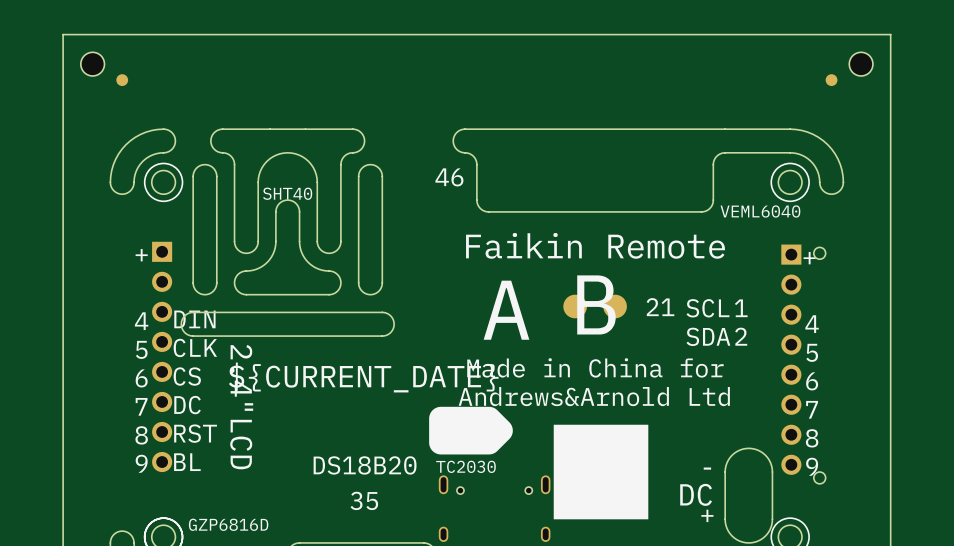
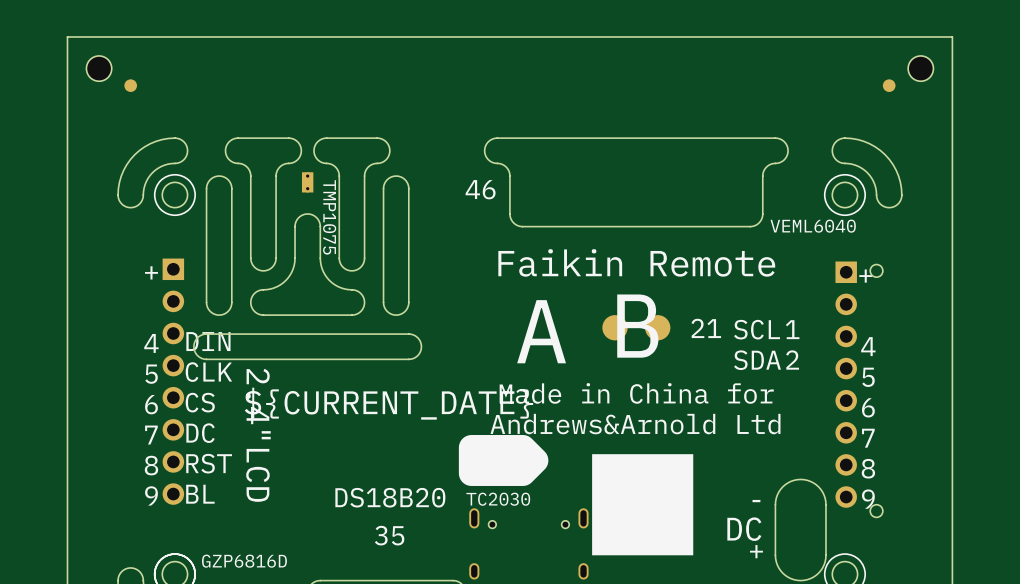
board edge: (305, 129) (269, 129) -> (326, 138) (316, 143) (314, 154) (320, 161) (332, 164) (337, 169) (339, 195)
board edge: (790, 129) (725, 129) -> (844, 138) (836, 141) (832, 150) (836, 159) (844, 163)
board edge: (790, 152) (725, 152) -> (775, 138) (784, 141) (788, 150) (784, 159) (775, 163)
part: none -> (307, 182)
board edge: (317, 182) (315, 171) (308, 161) (299, 155) (287, 152) (276, 155) (266, 161) (260, 171) (258, 182) -> (288, 138) (298, 143) (300, 154) (295, 161) (283, 164) (278, 169) (276, 195)
text: SHT40 (287, 193) -> none
text: none -> TMP1075 (329, 217)

